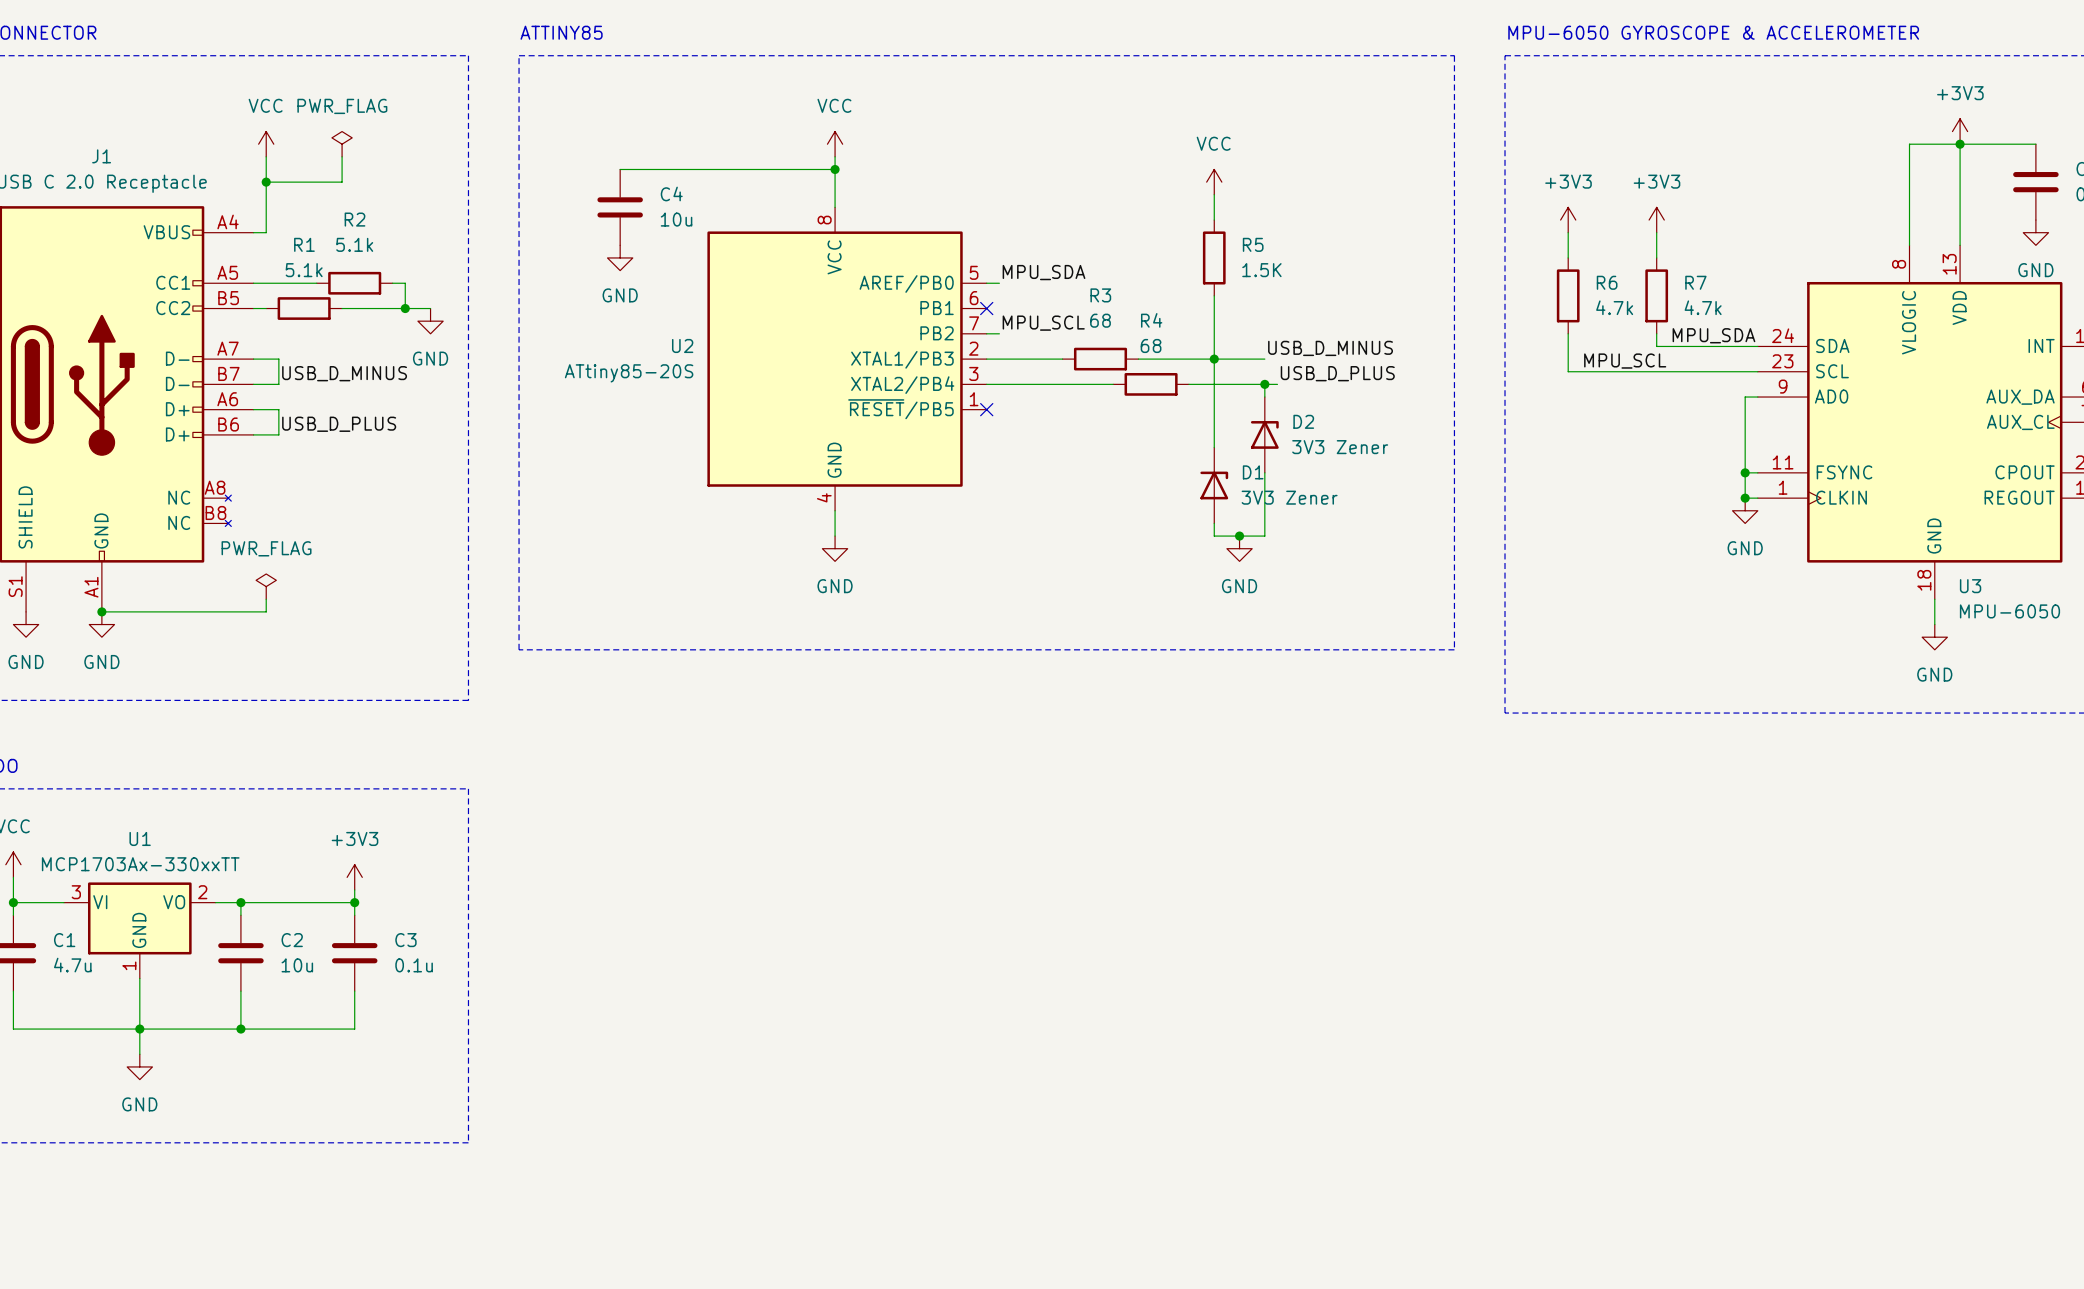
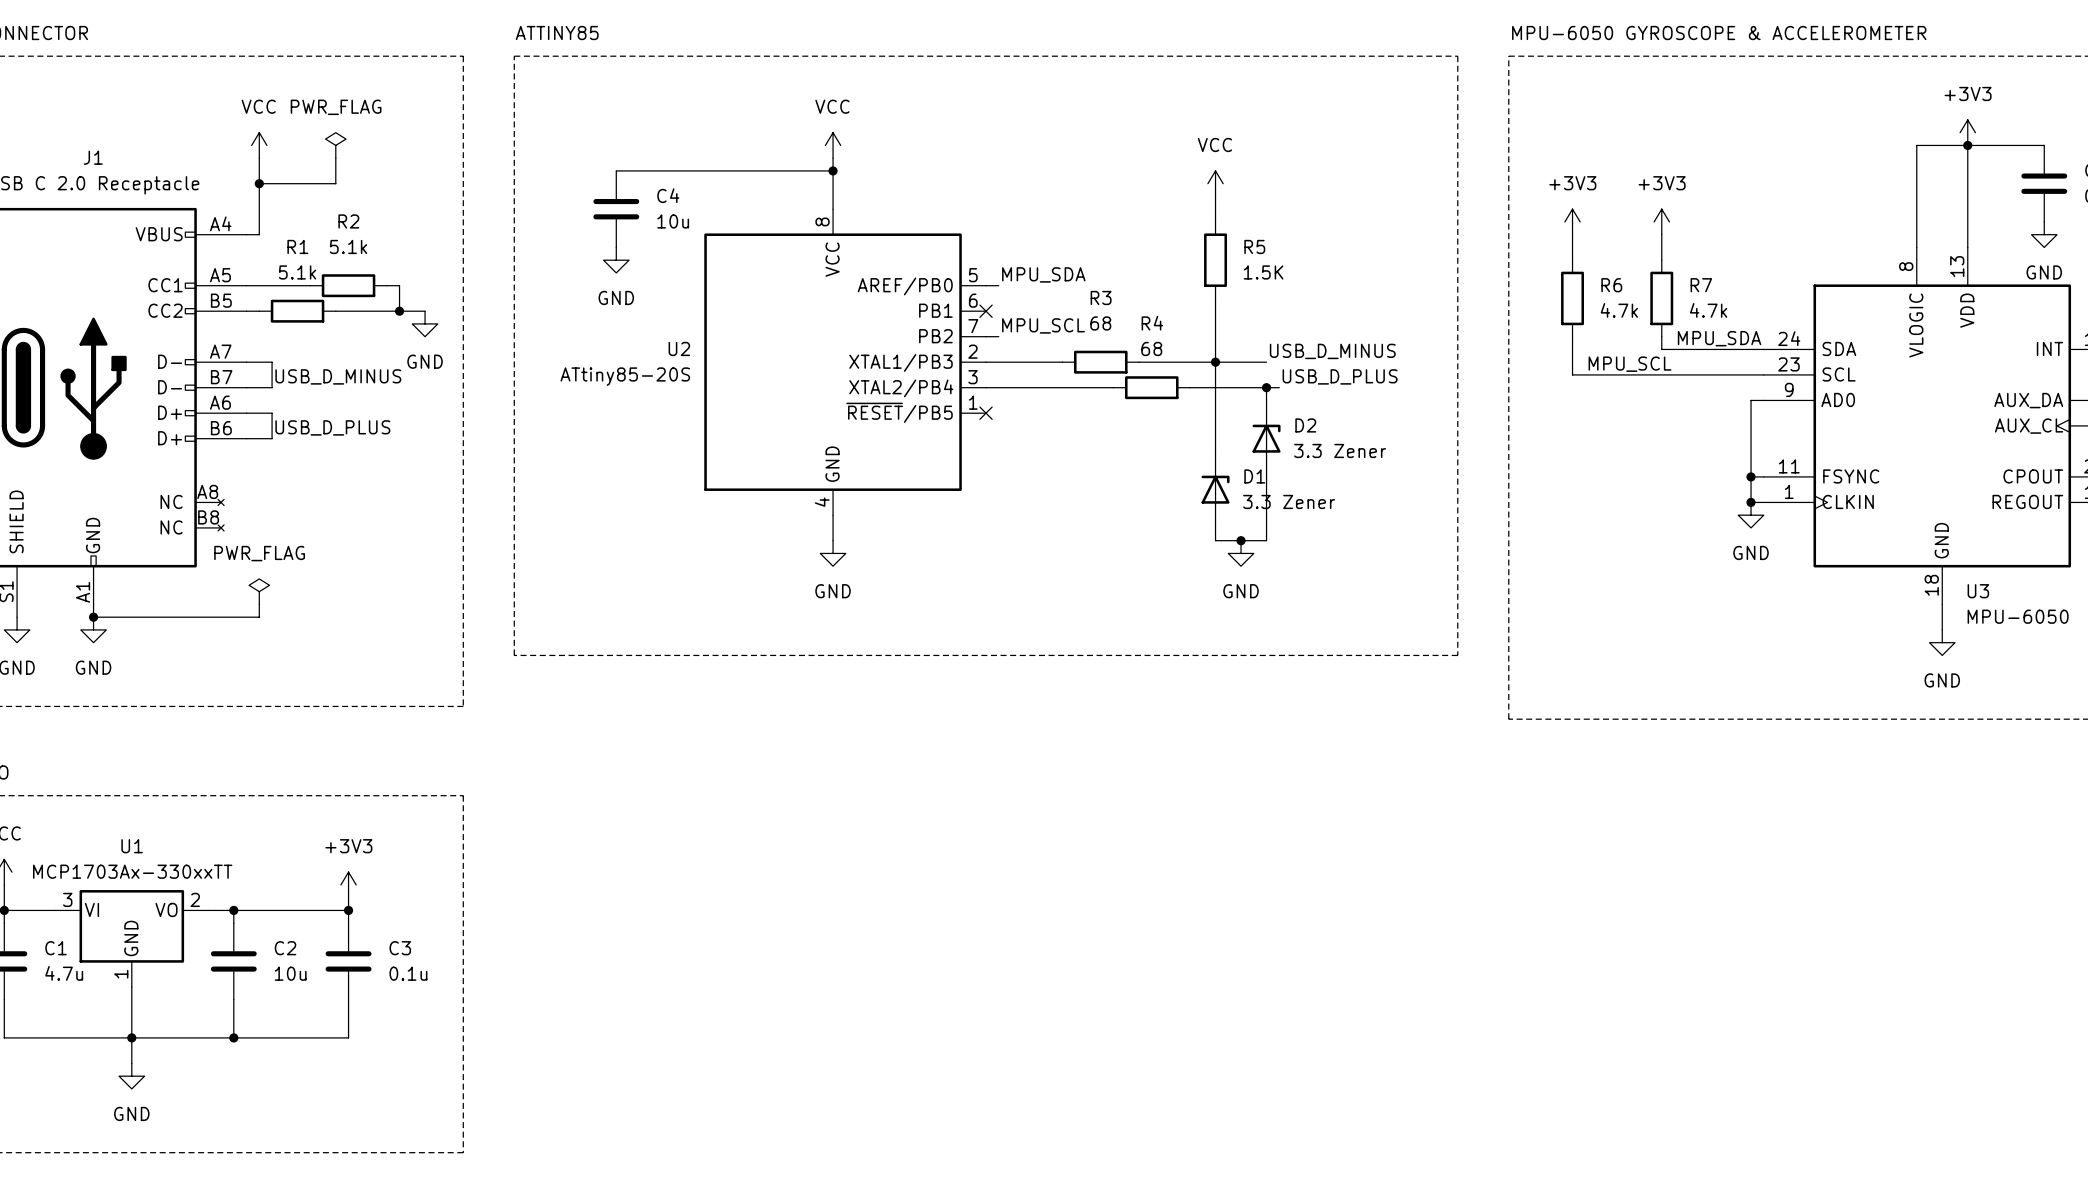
D2 value: 3V3 Zener (1340, 447) -> 3.3 Zener (1340, 450)
D1 value: 3V3 Zener (1289, 497) -> 3.3 Zener (1289, 501)

